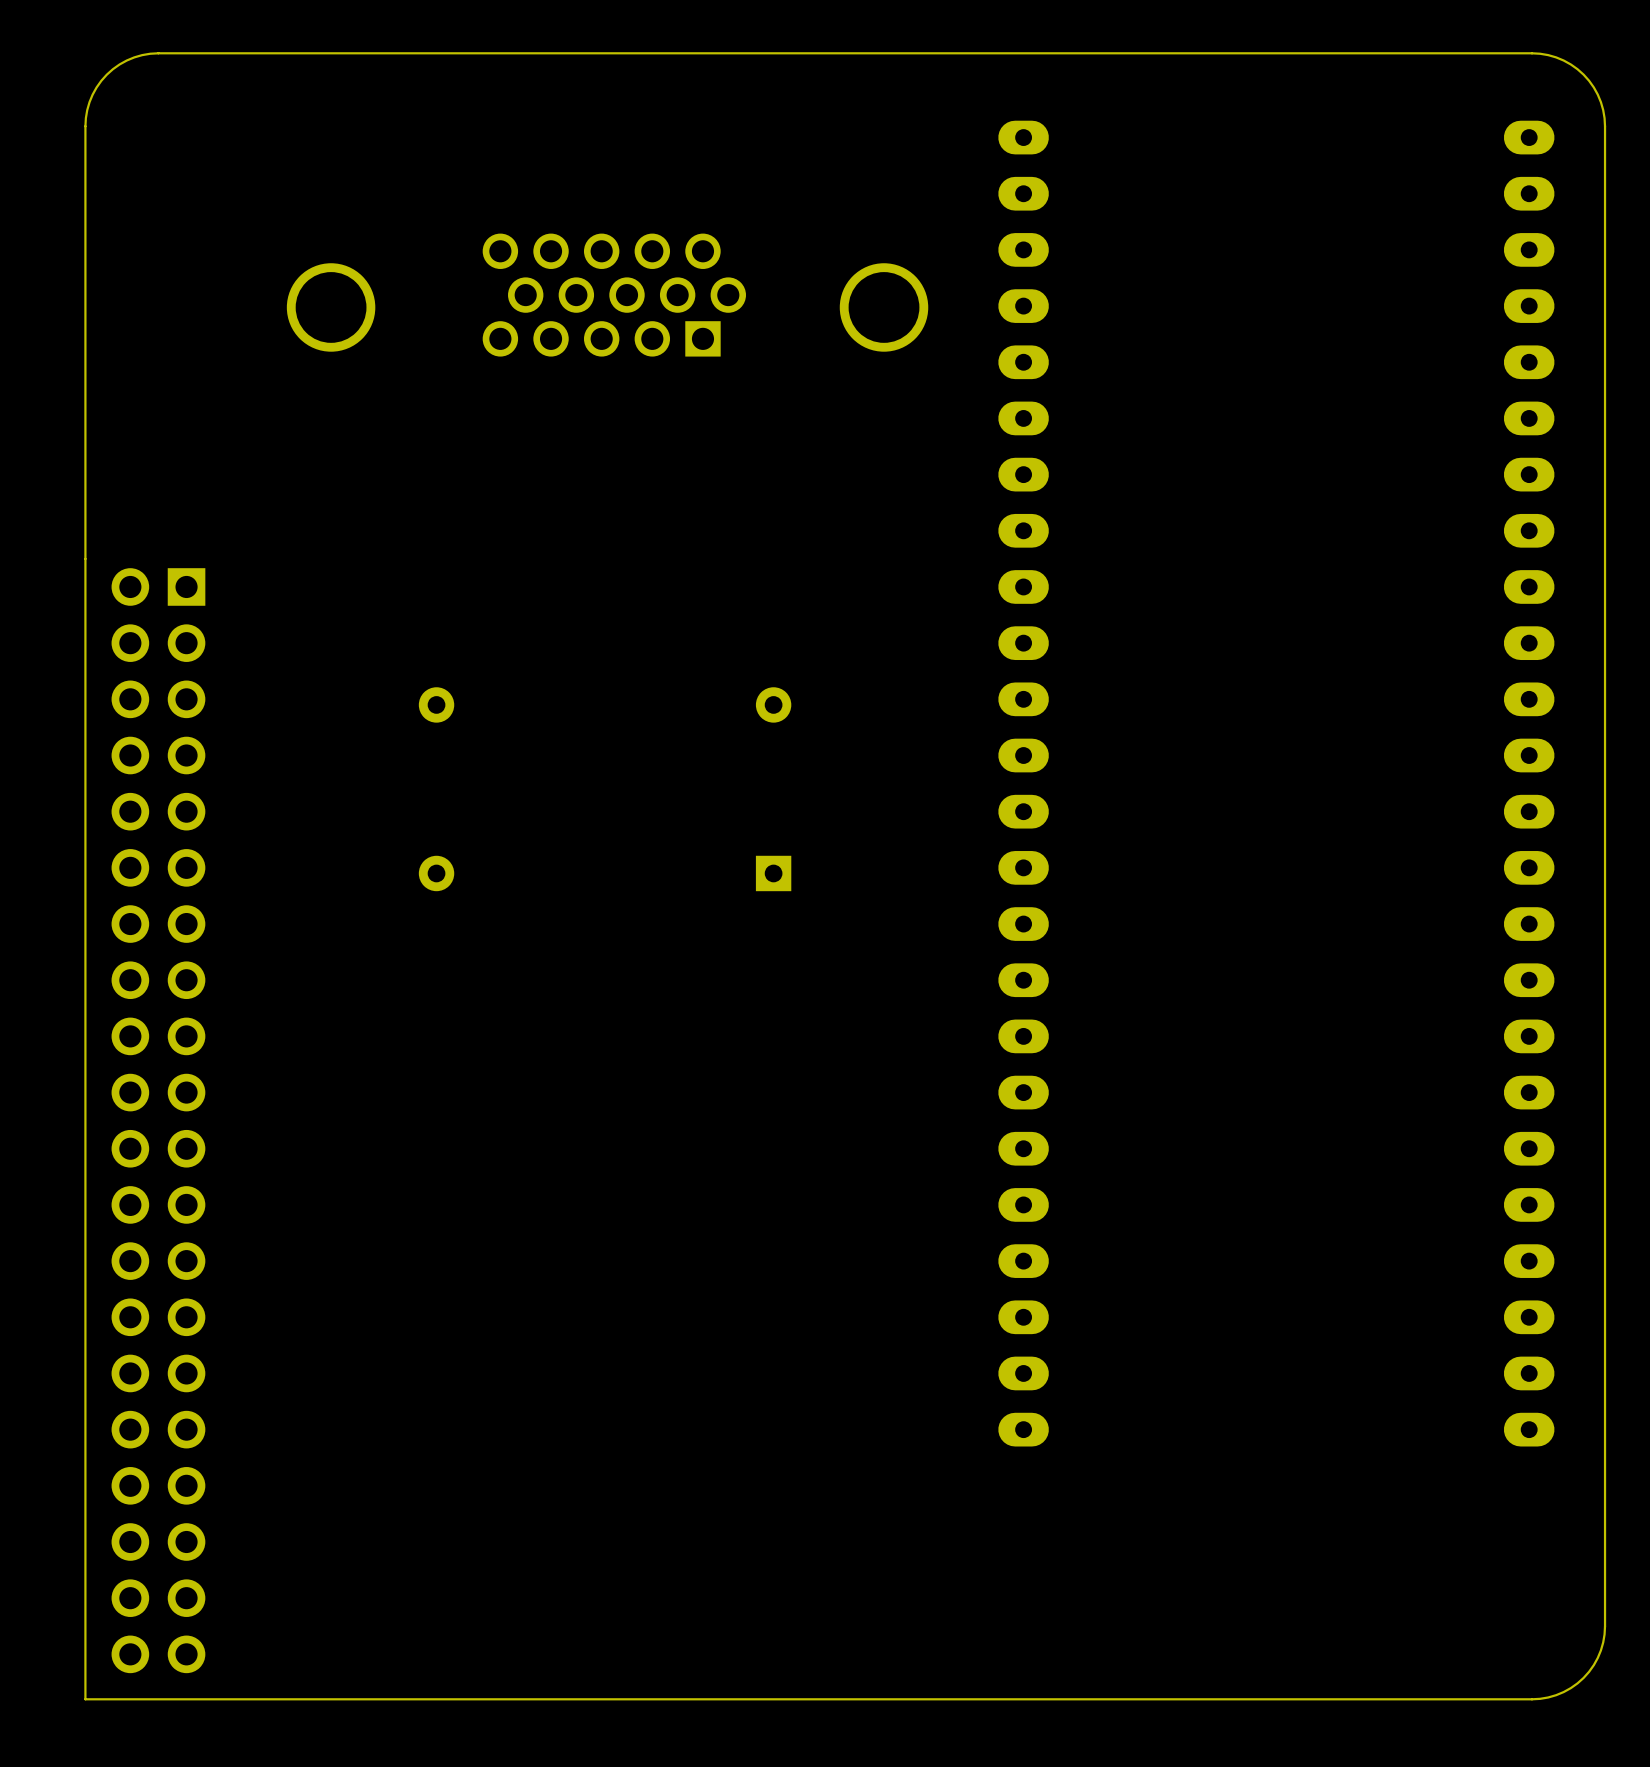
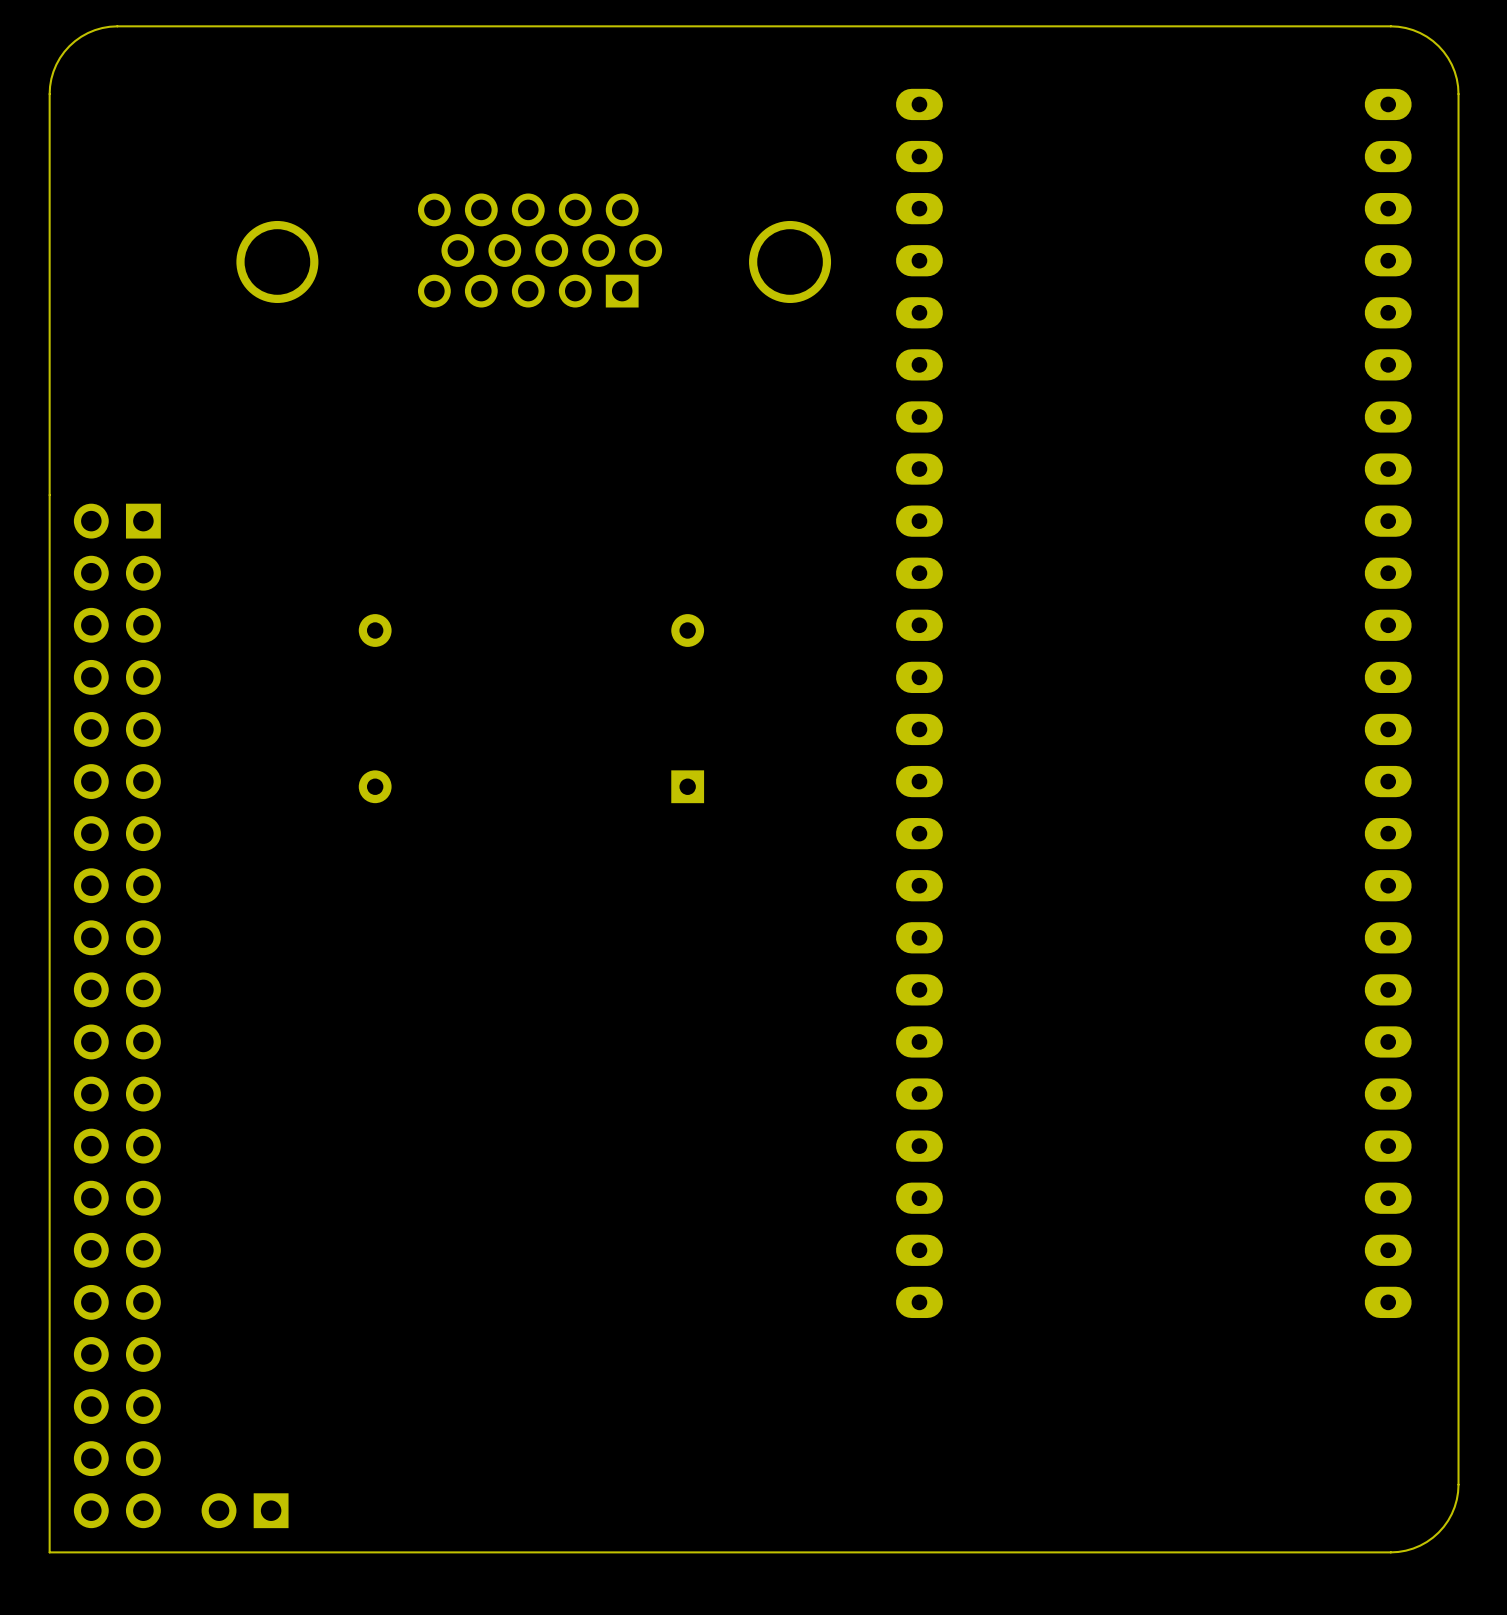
part: none -> (245, 1510)

